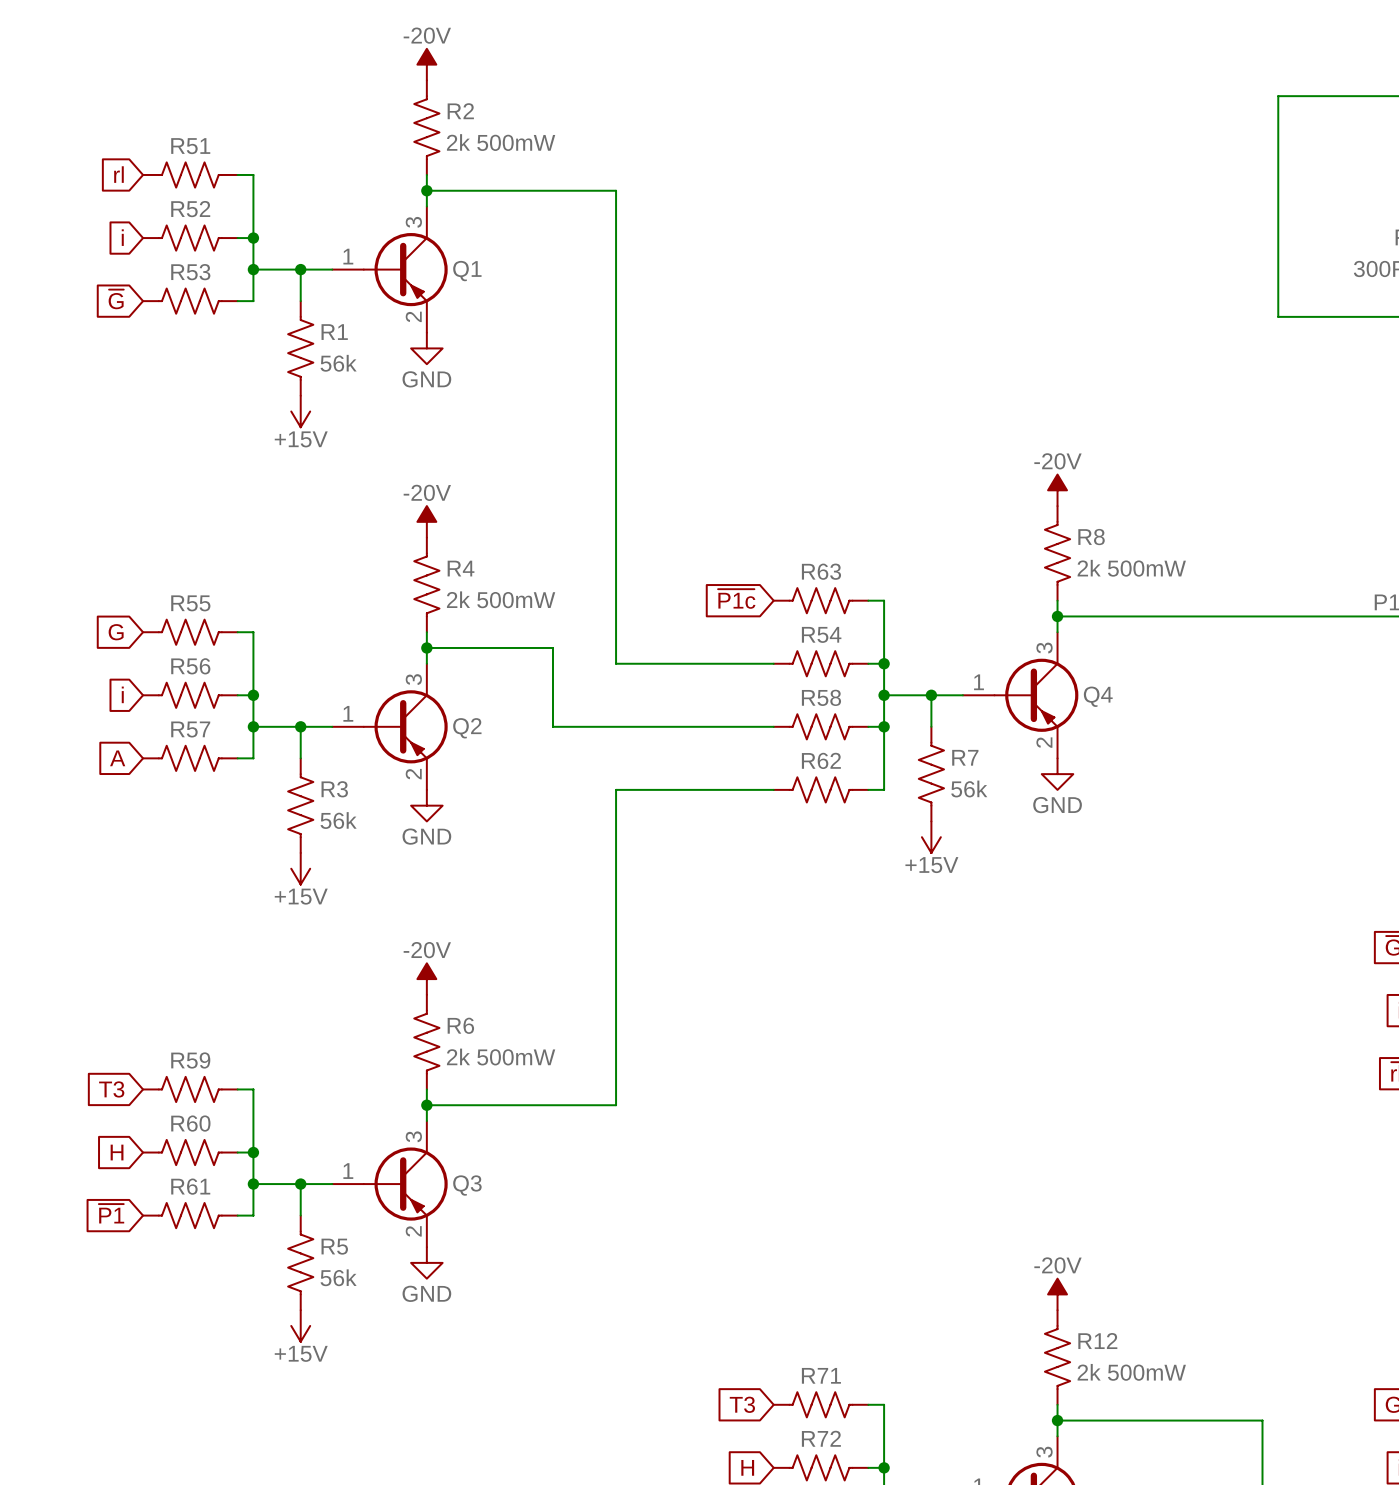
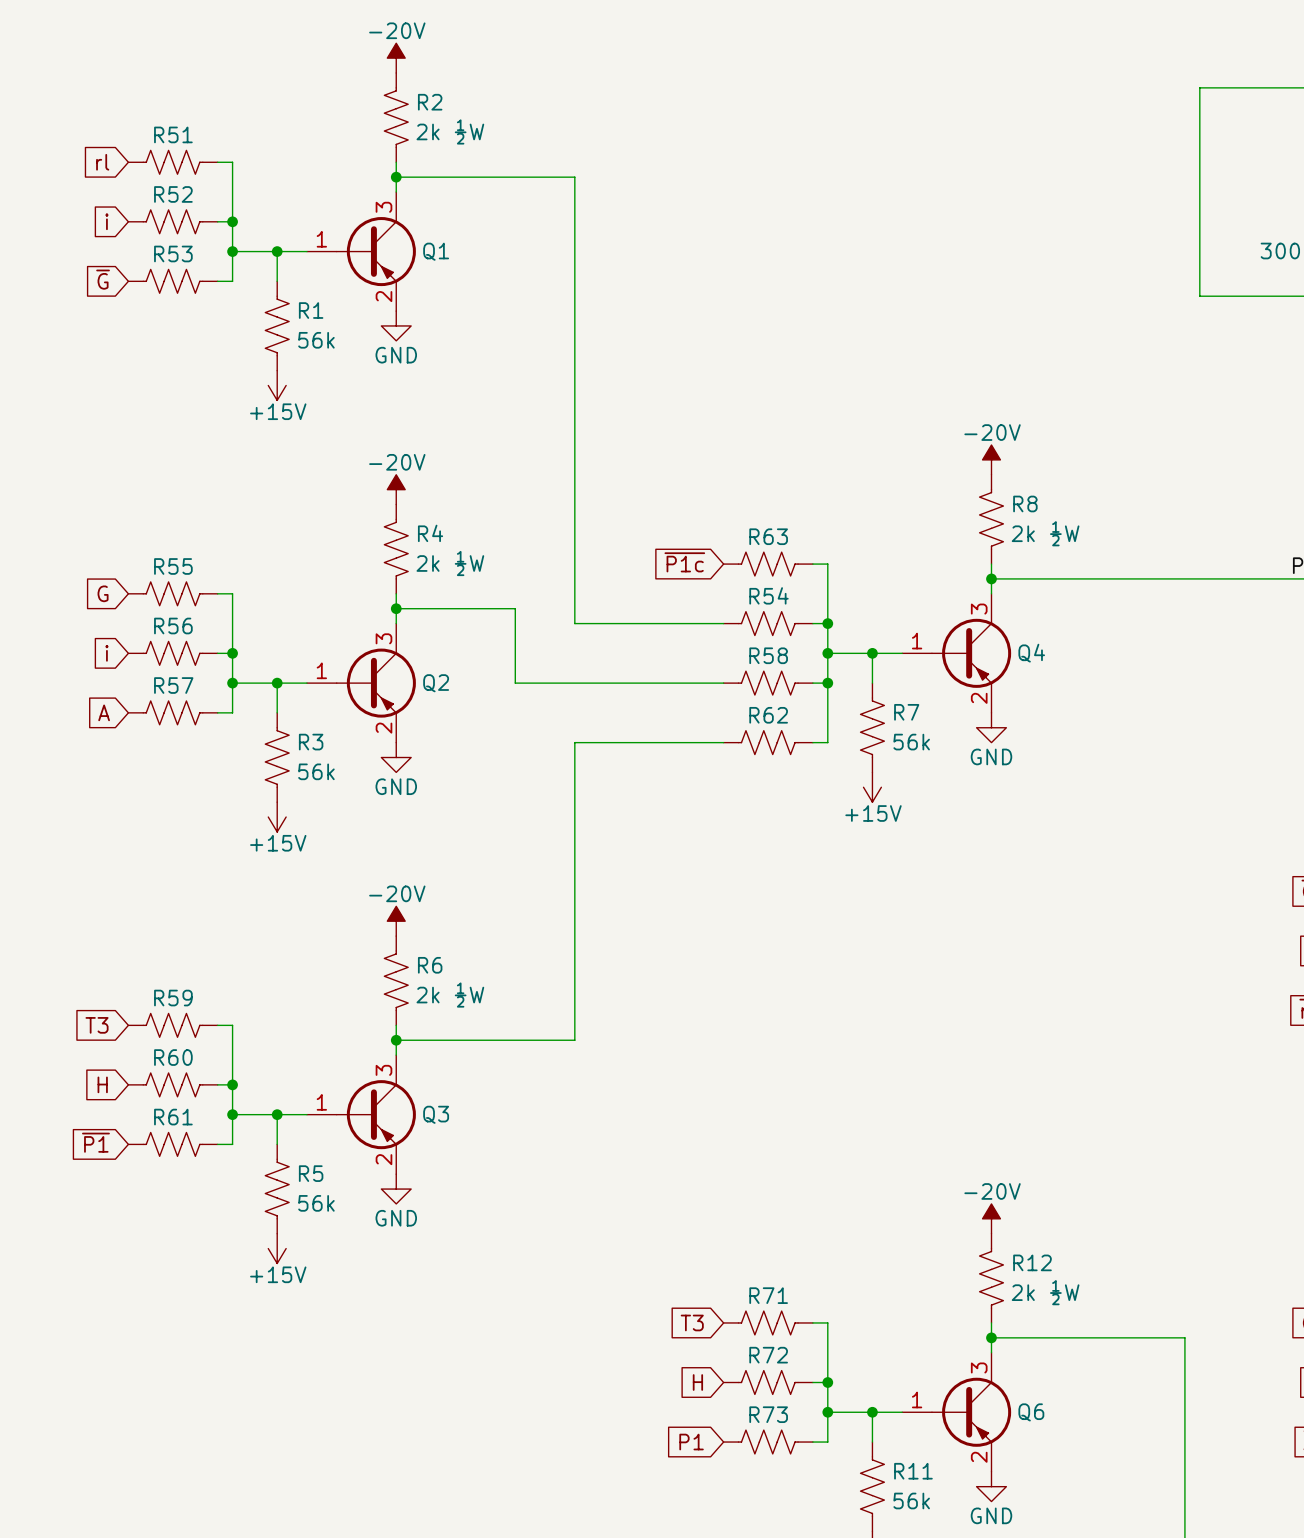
R2 value: 2k 500mW (501, 142) -> 2k ½W (450, 131)
R8 value: 2k 500mW (1131, 568) -> 2k ½W (1045, 533)
R4 value: 2k 500mW (501, 599) -> 2k ½W (450, 563)
R6 value: 2k 500mW (501, 1057) -> 2k ½W (450, 995)
R12 value: 2k 500mW (1131, 1372) -> 2k ½W (1045, 1292)

